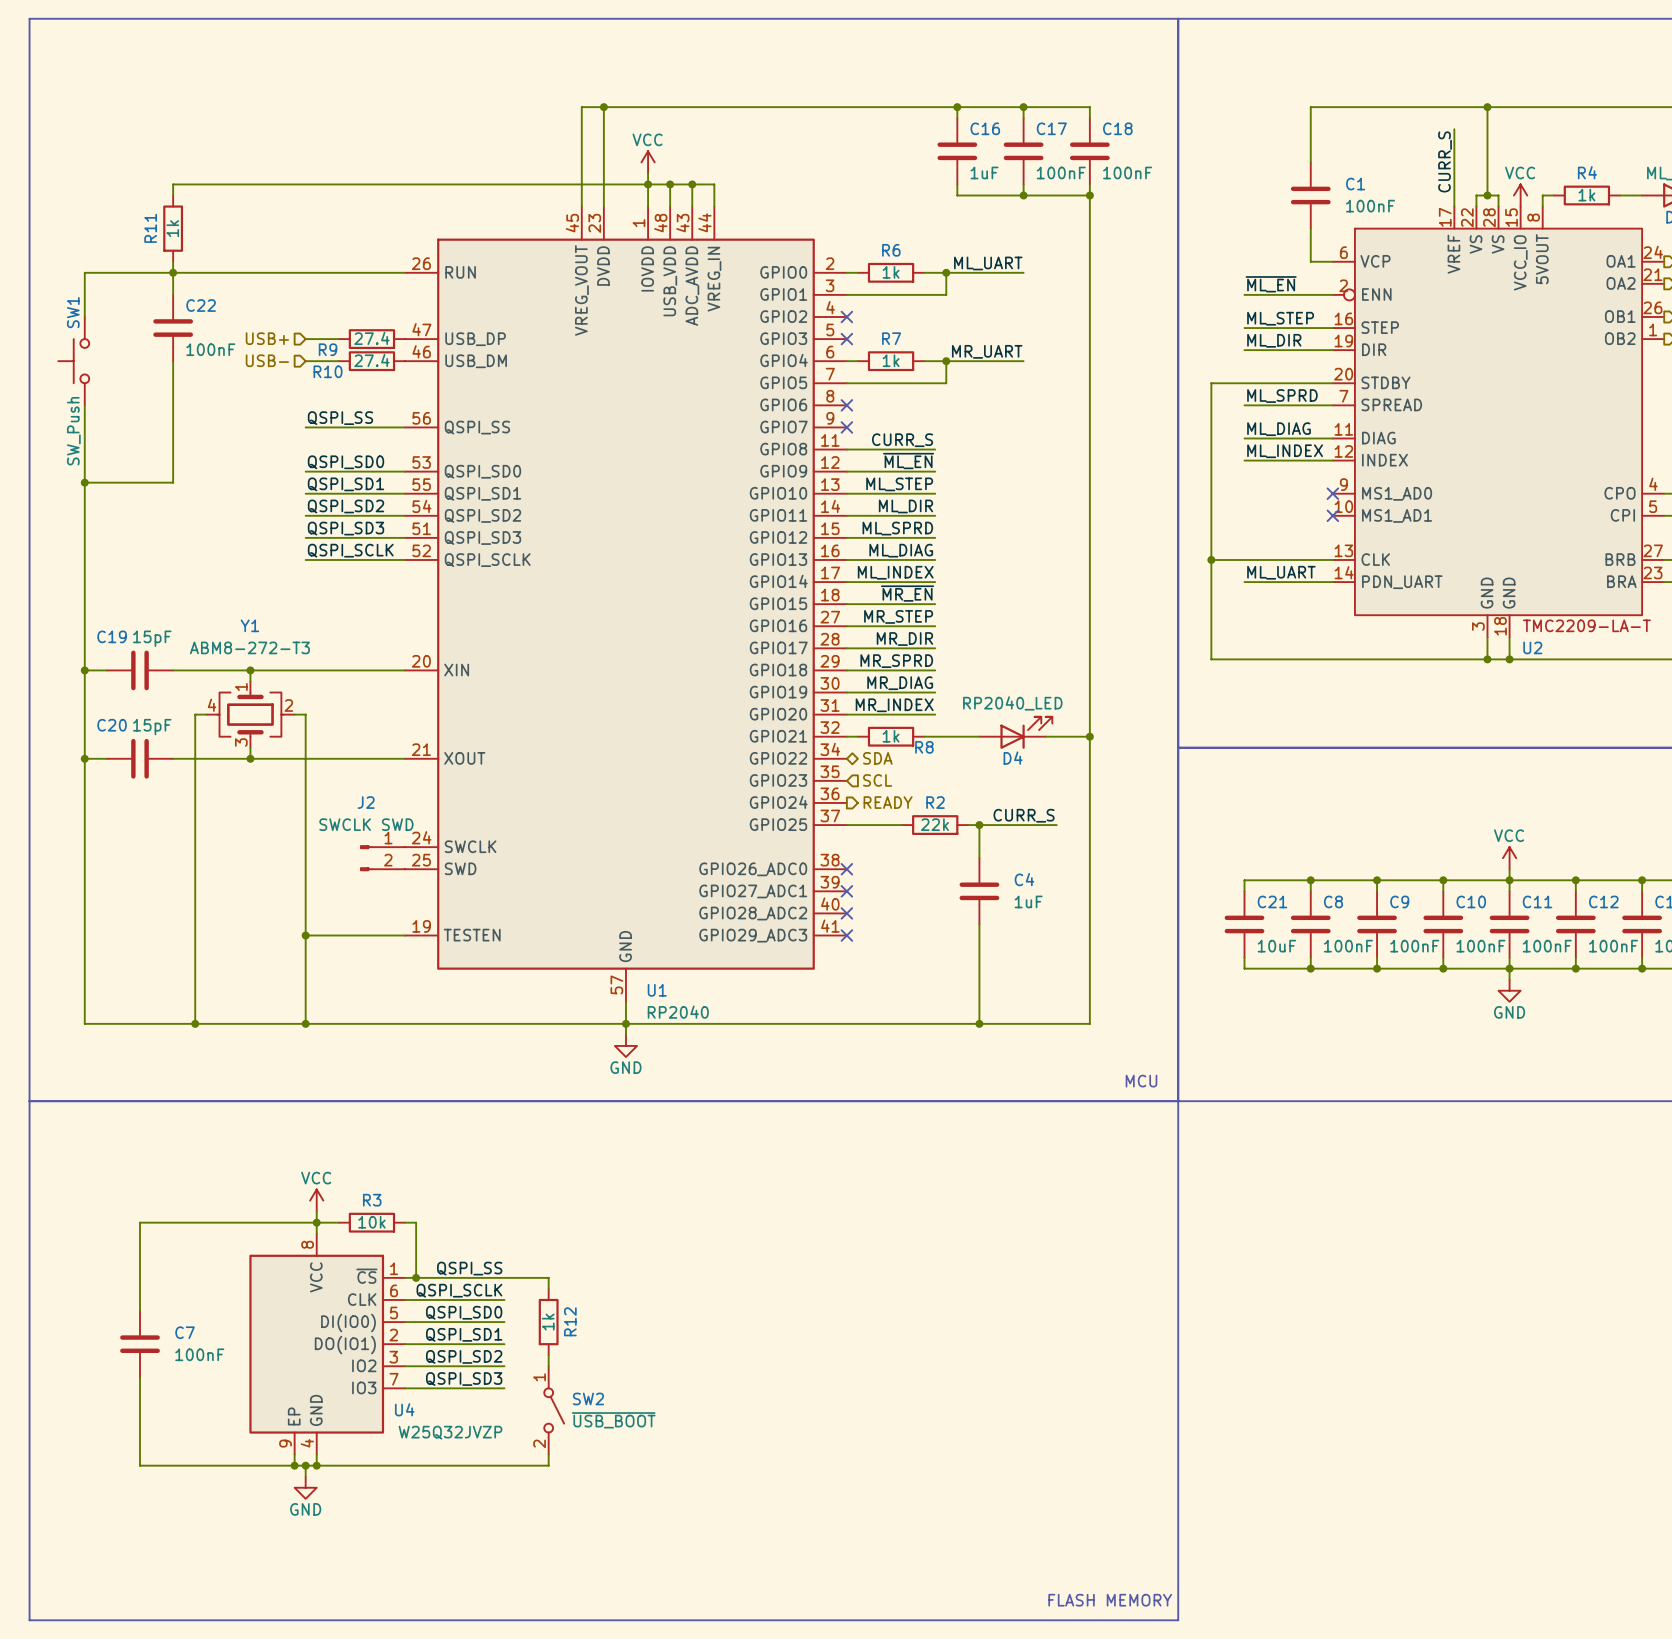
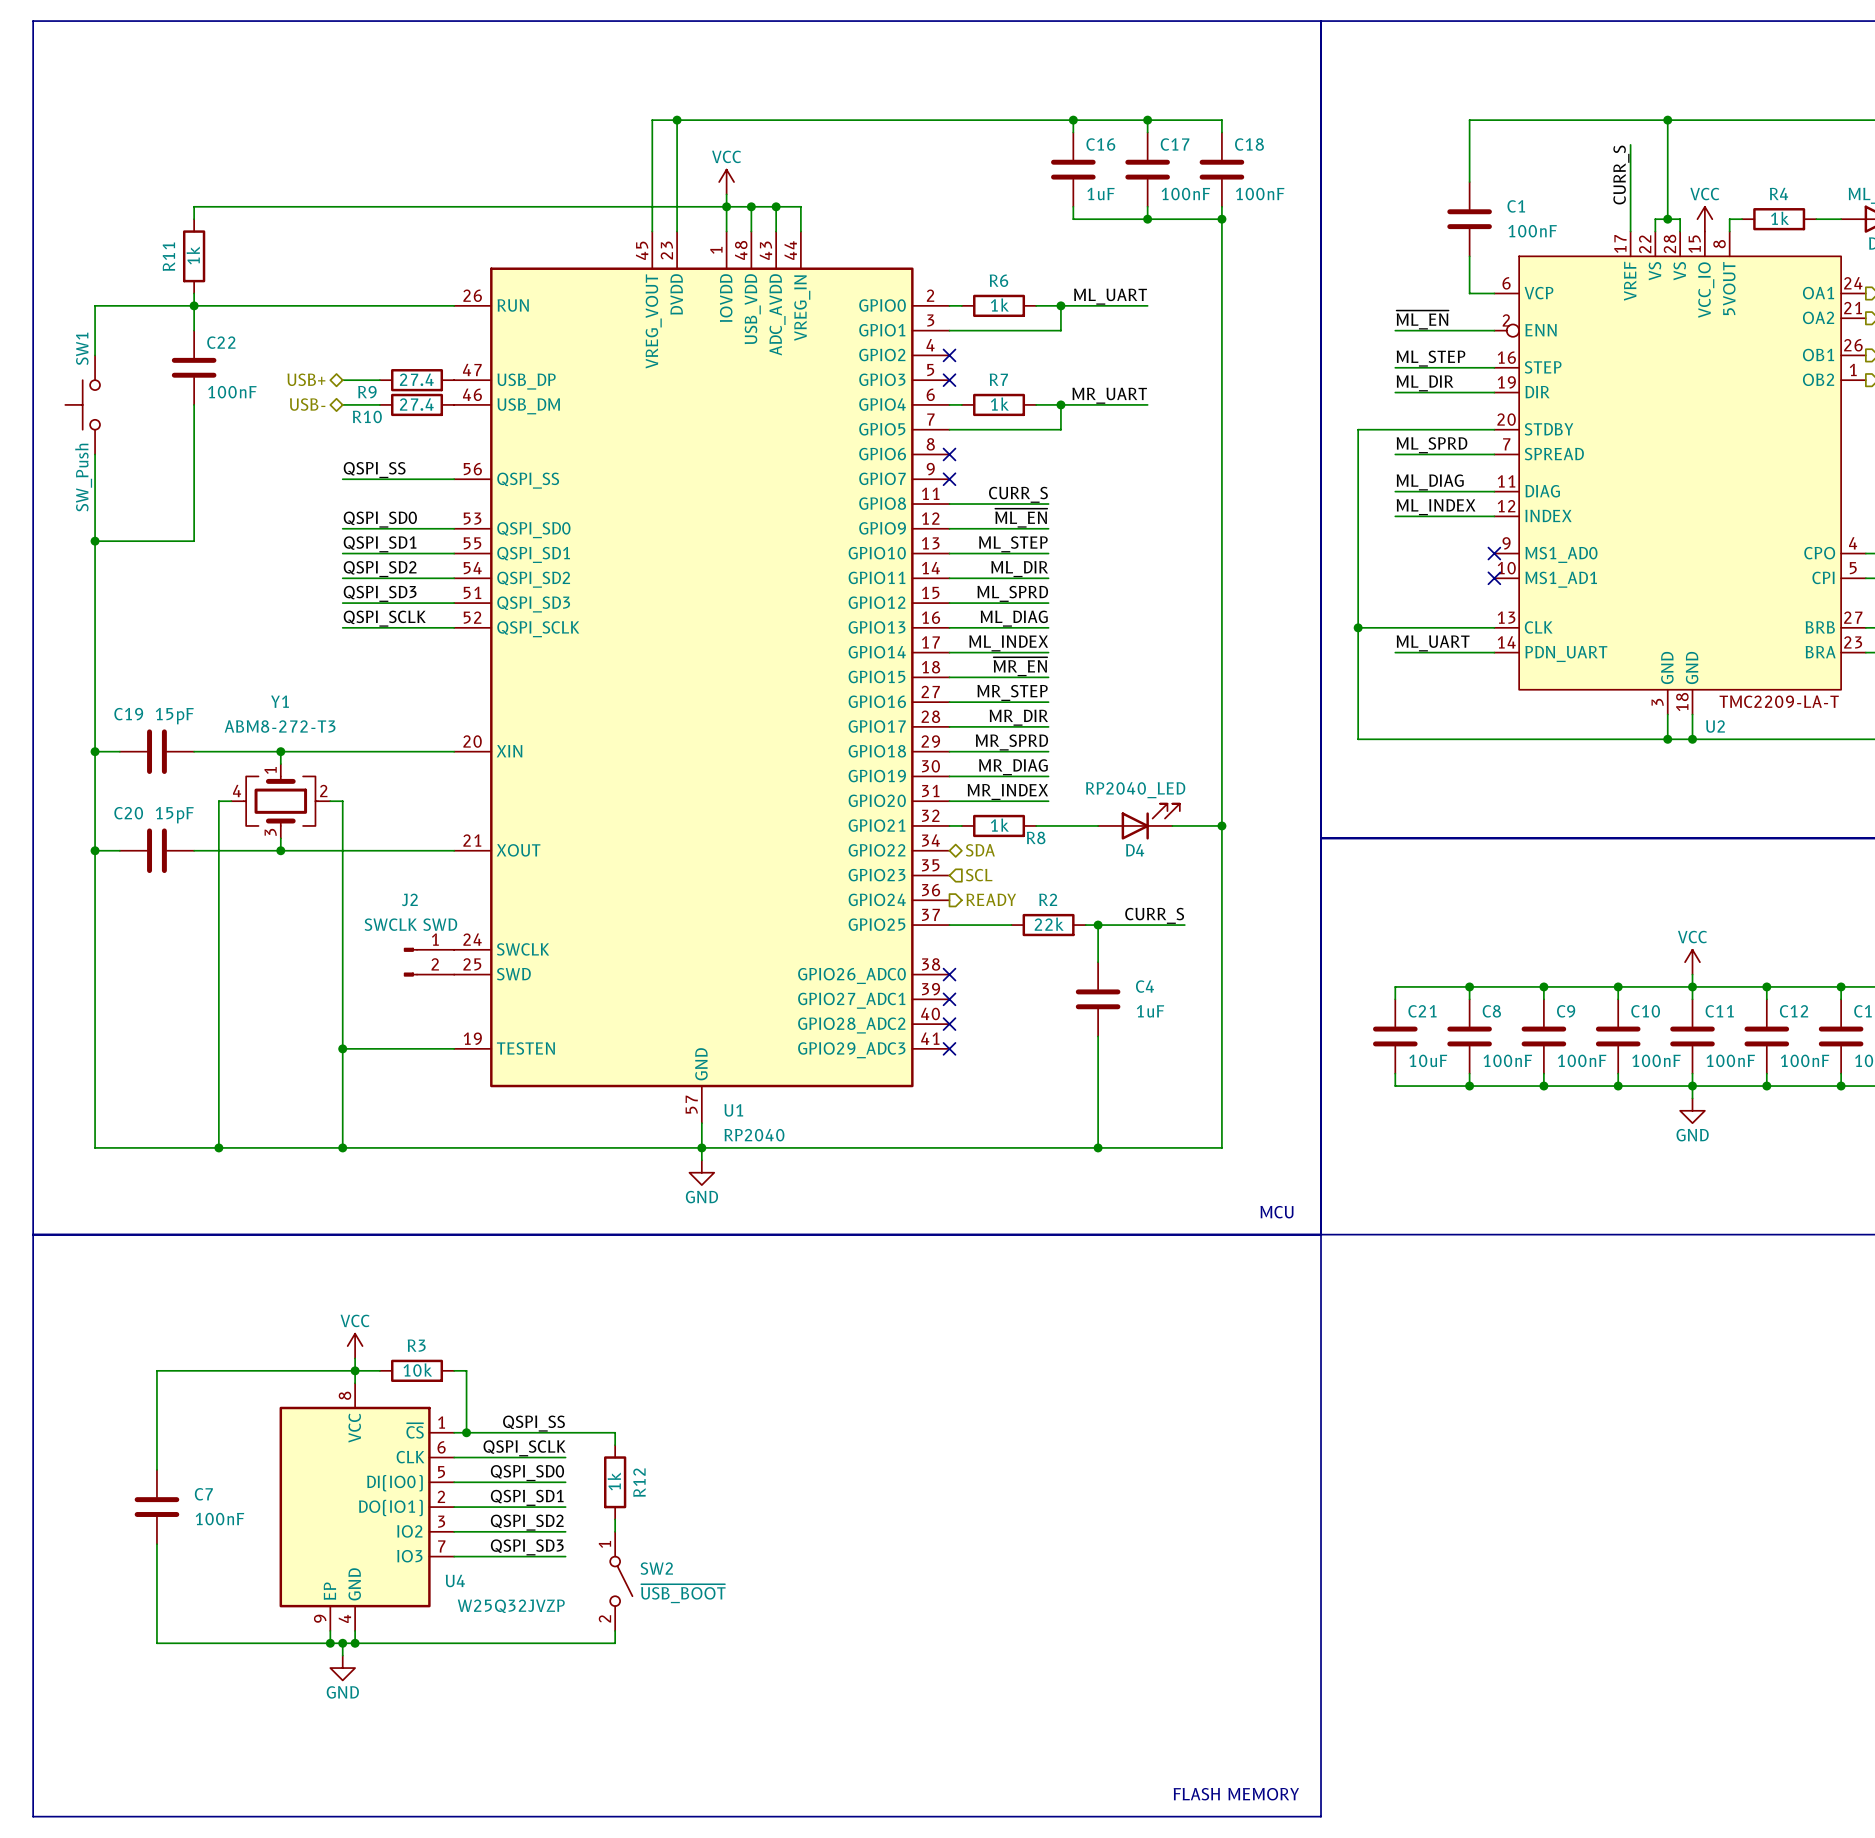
hierarchical label shape: input (267, 338) -> bidirectional (306, 379)
hierarchical label shape: input (267, 360) -> bidirectional (307, 404)

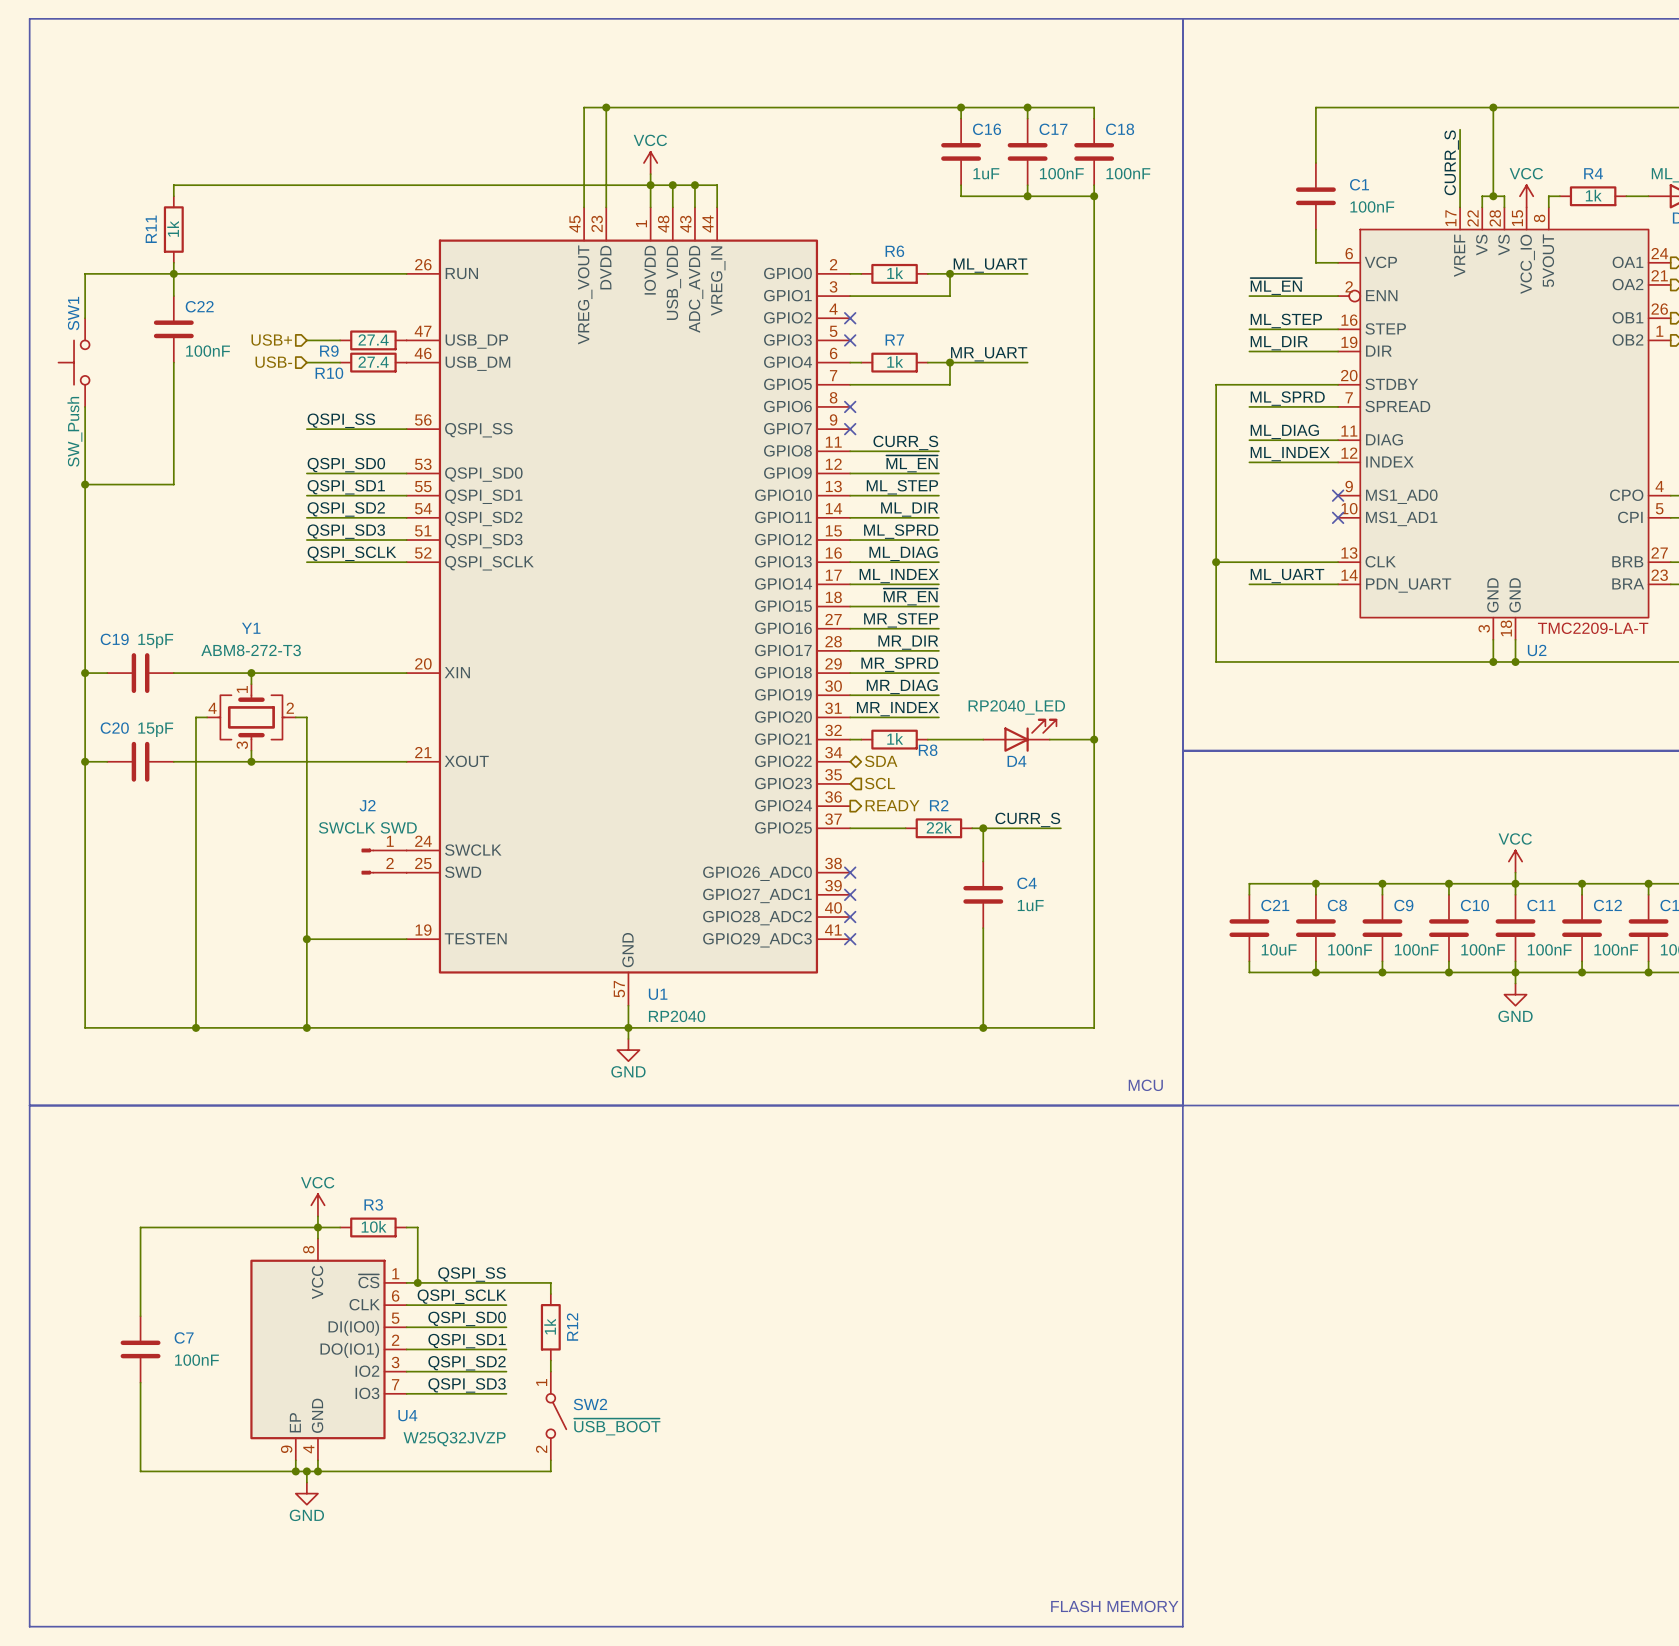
hierarchical label shape: bidirectional (306, 379) -> input (271, 340)
hierarchical label shape: bidirectional (307, 404) -> input (273, 362)

